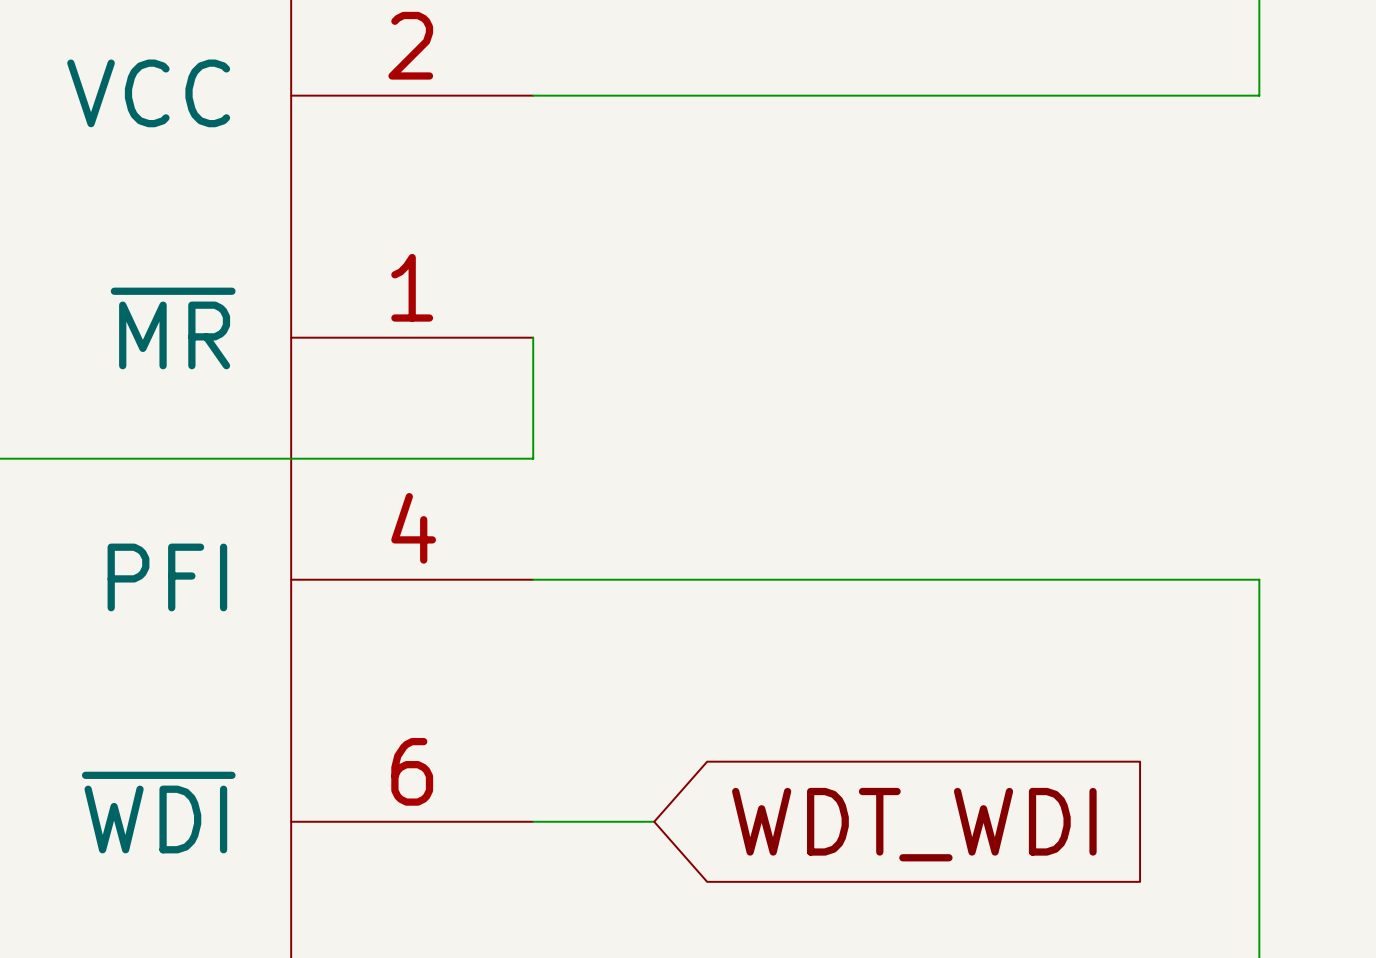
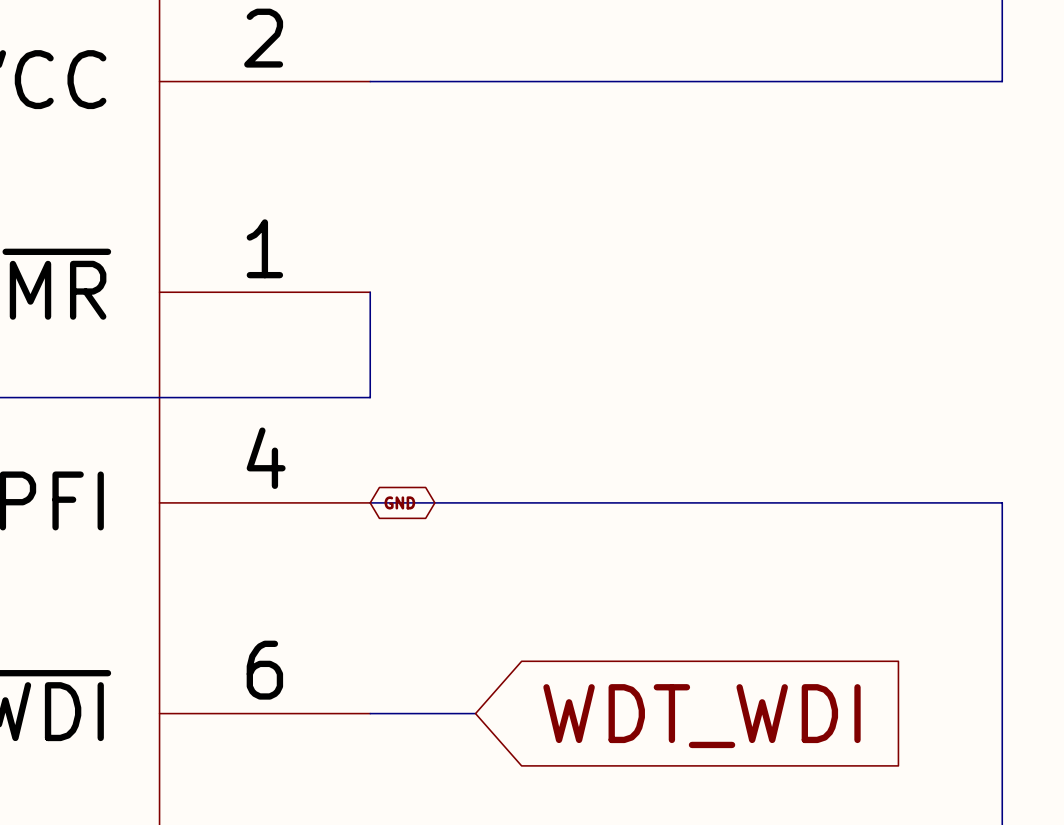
global label: none -> GND (399, 502)

